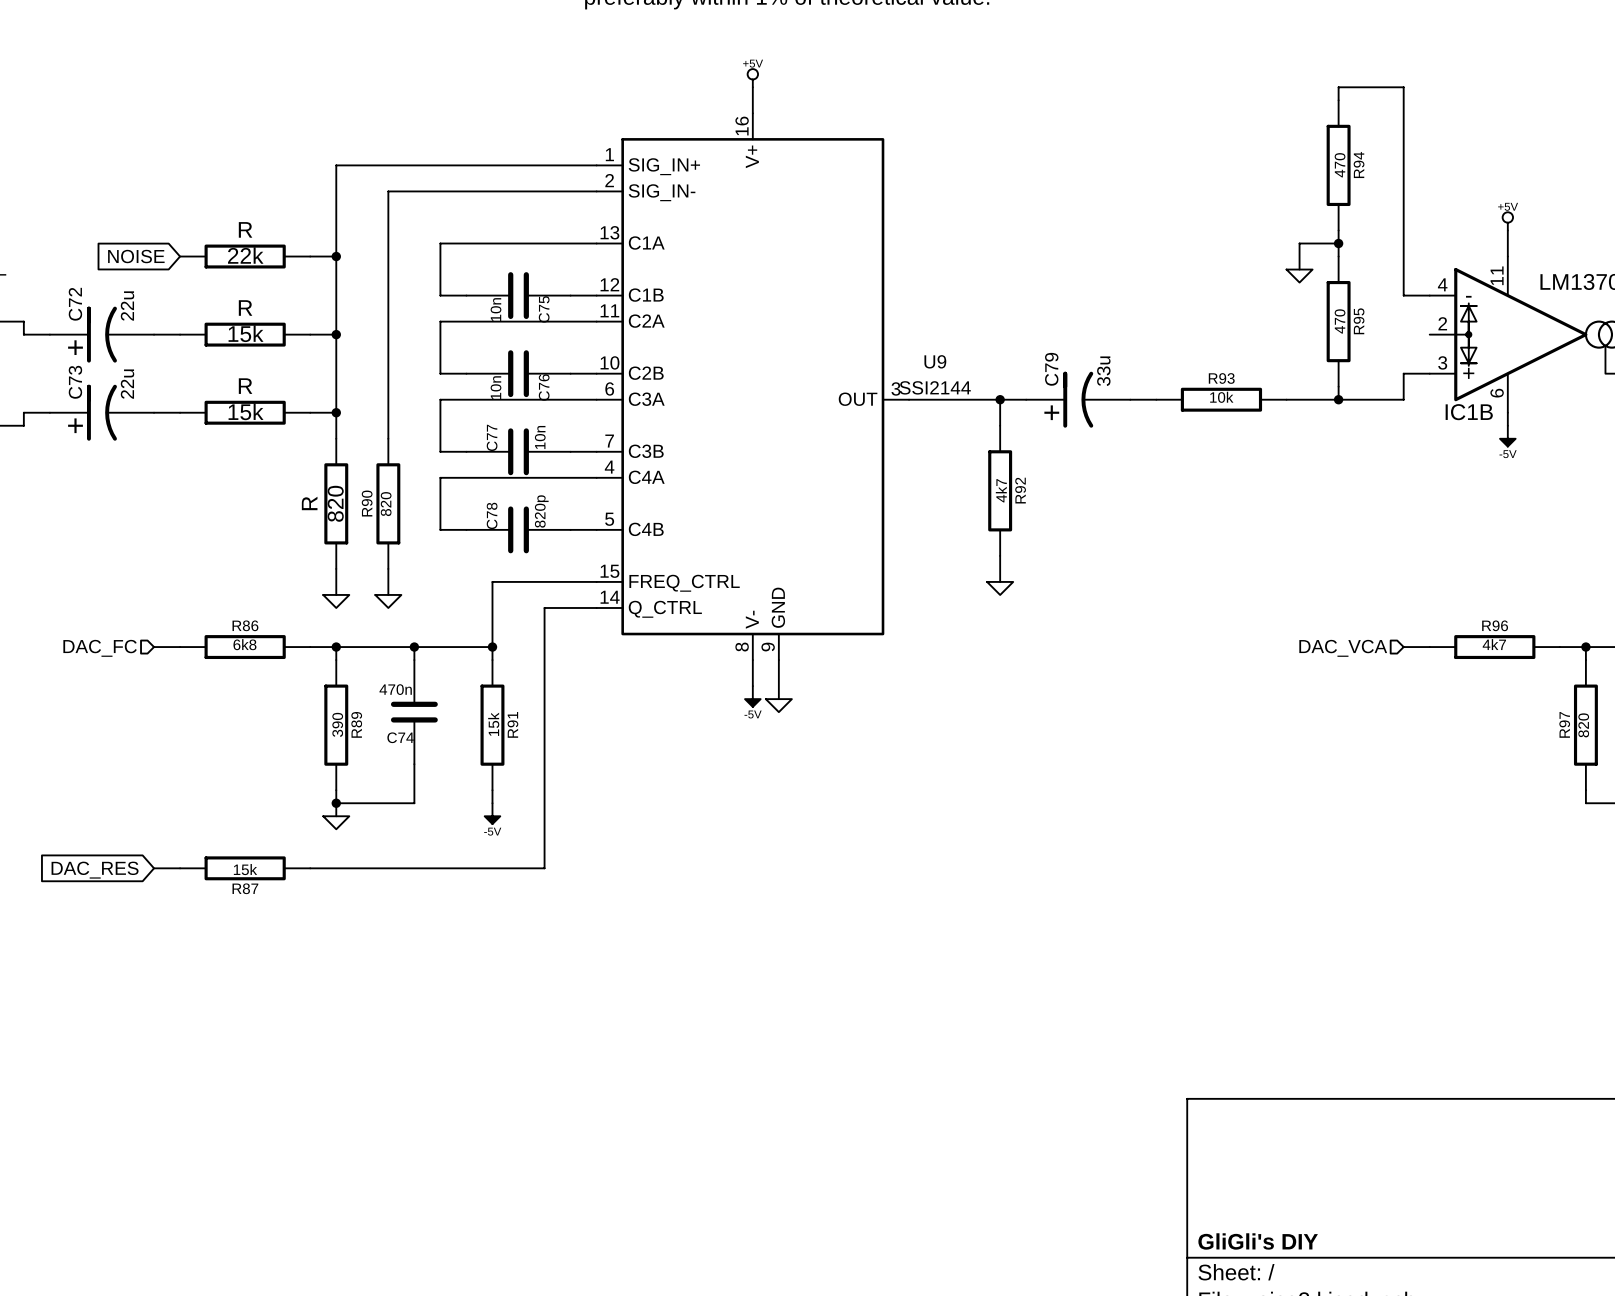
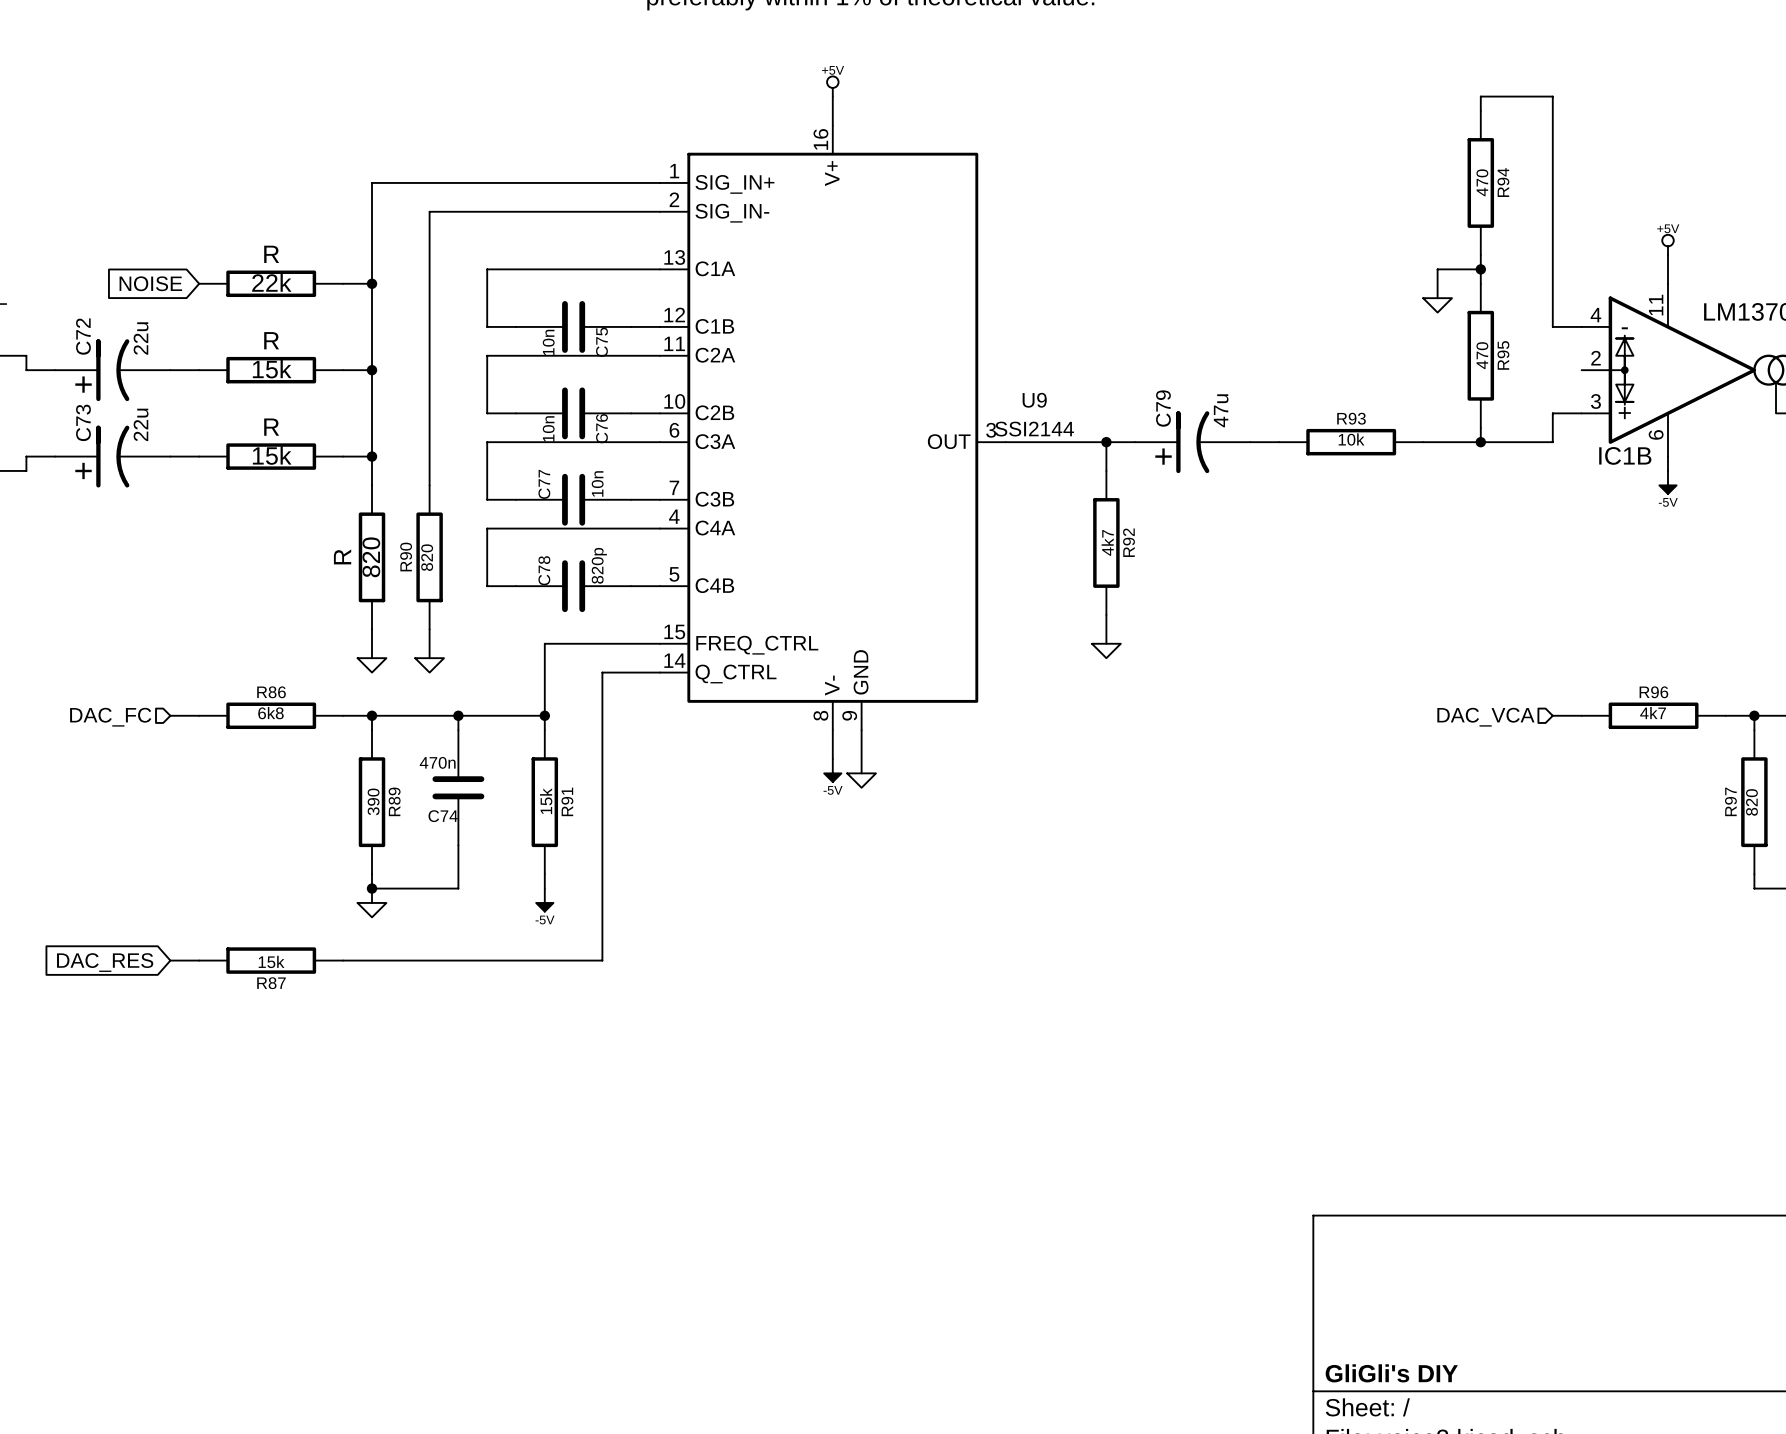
C79 value: 33u (1103, 371) -> 47u (1221, 410)

